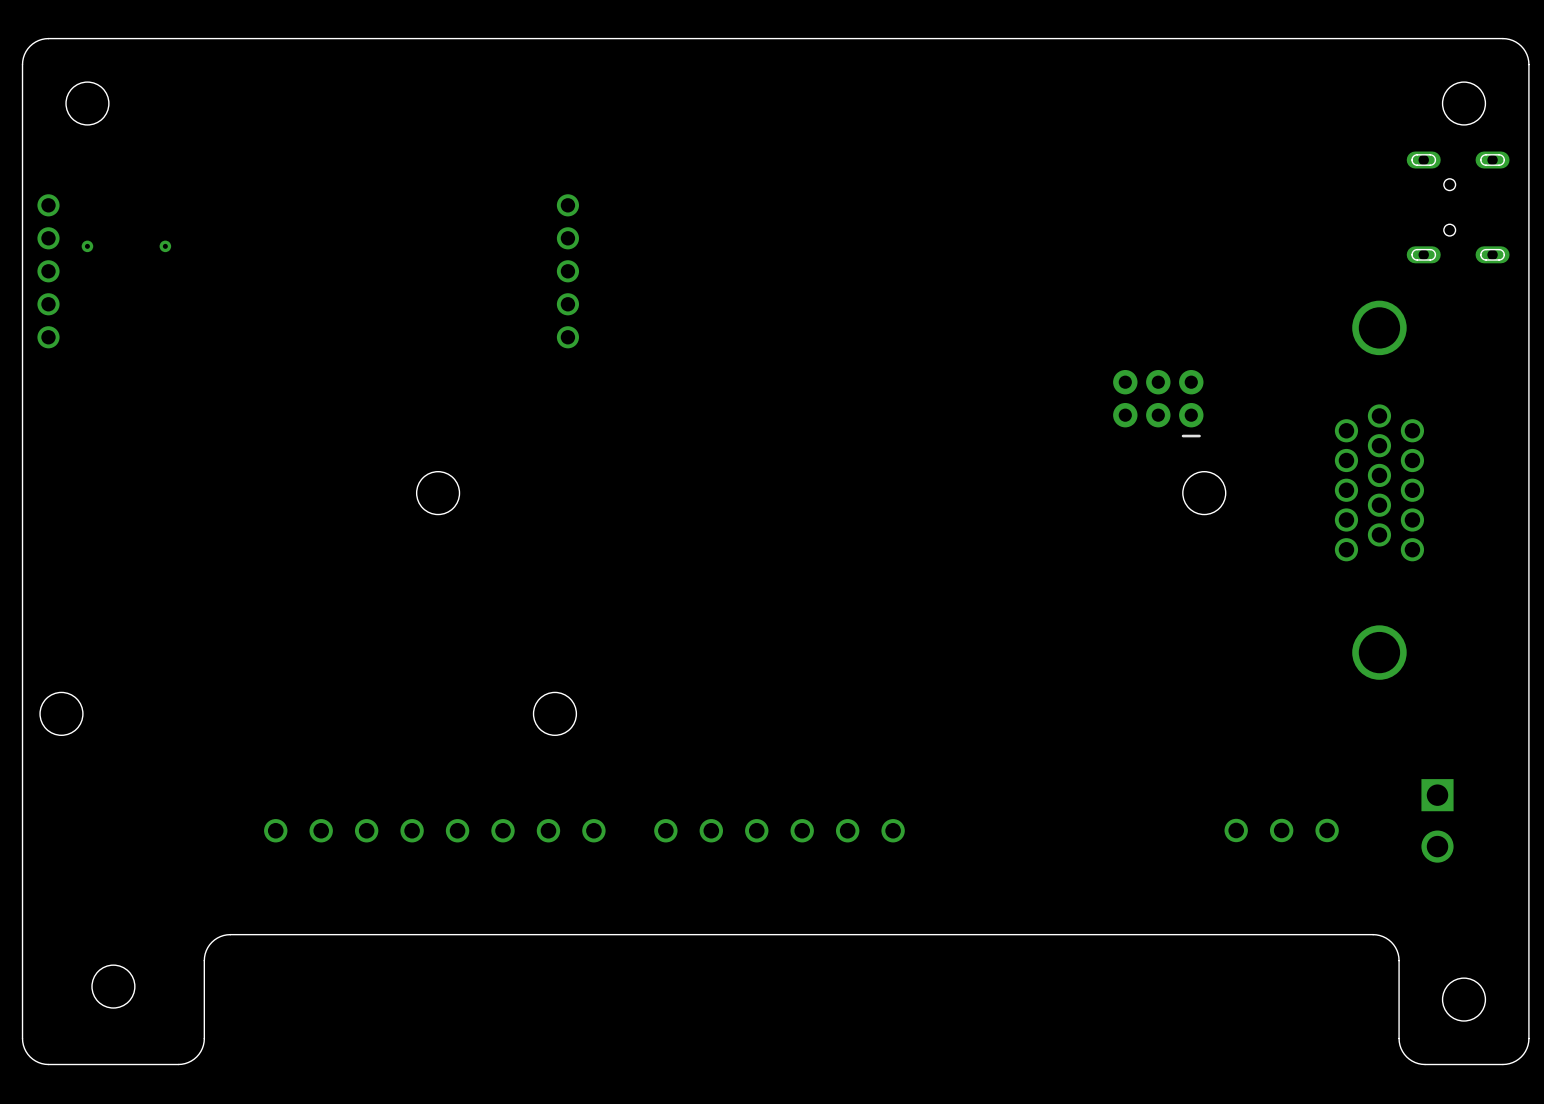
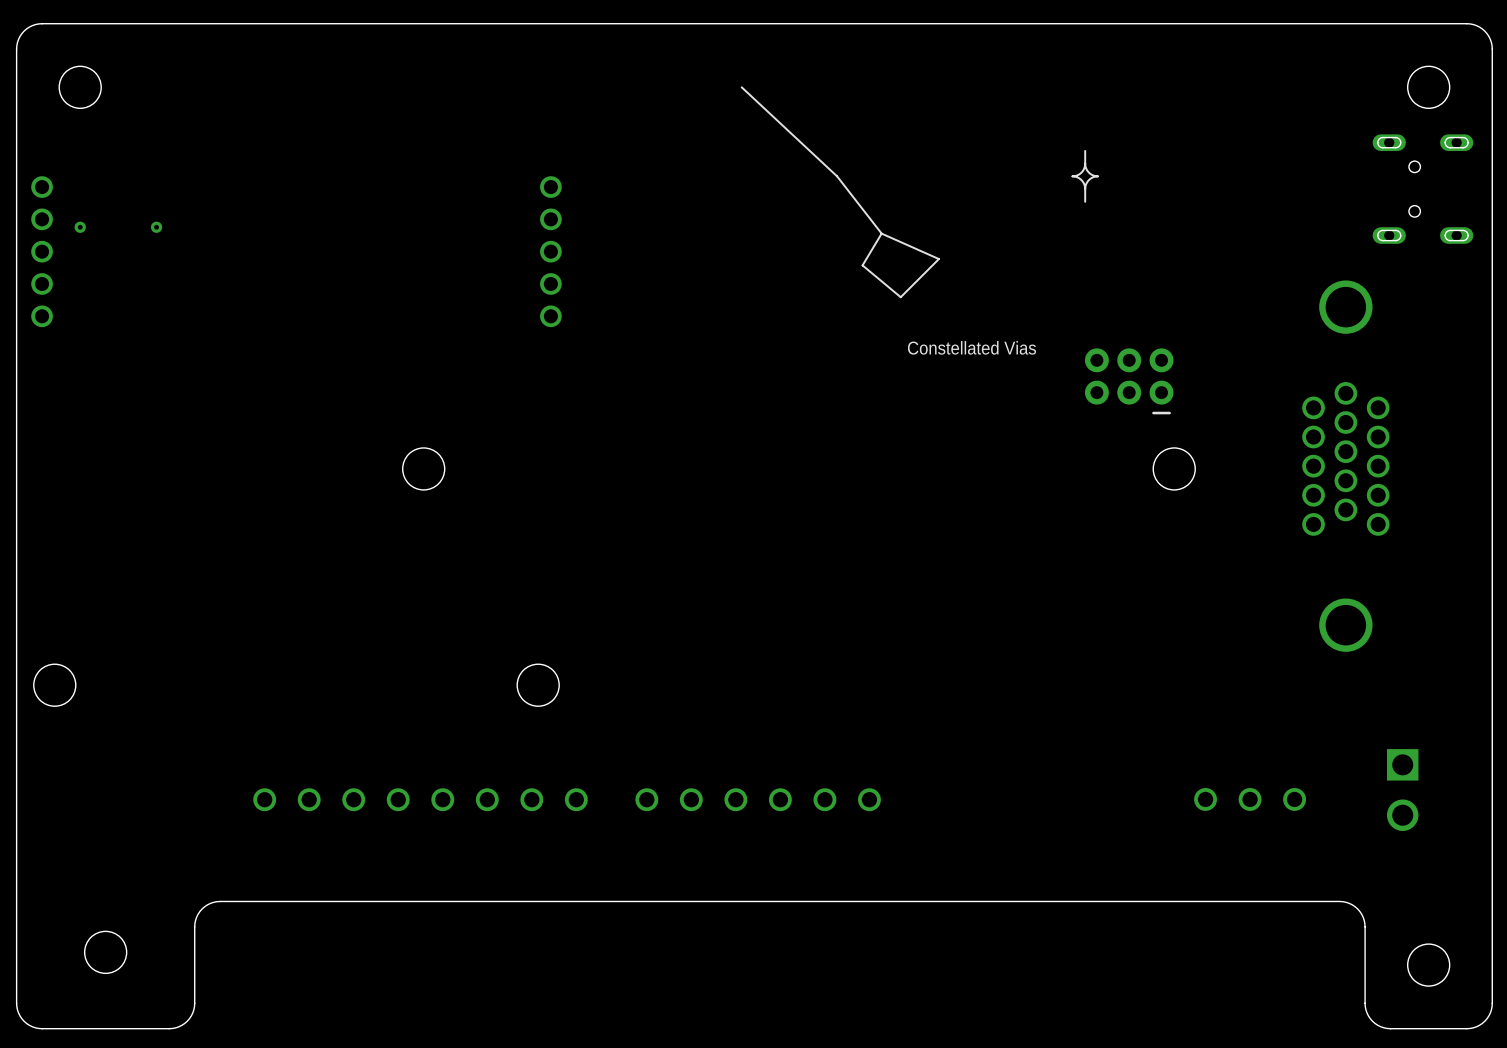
line: none -> (741, 87) (837, 176) (881, 233)
line: none -> (1085, 150) (1085, 163)
line: none -> (1085, 163) (1081, 172) (1072, 176) (1081, 180) (1085, 189)
line: none -> (1085, 163) (1088, 172) (1097, 176) (1088, 180) (1085, 189)
line: none -> (1085, 189) (1085, 201)
line: none -> (881, 233) (938, 259) (900, 297) (862, 265) (881, 233)
text: none -> Constellated Vias (971, 347)

